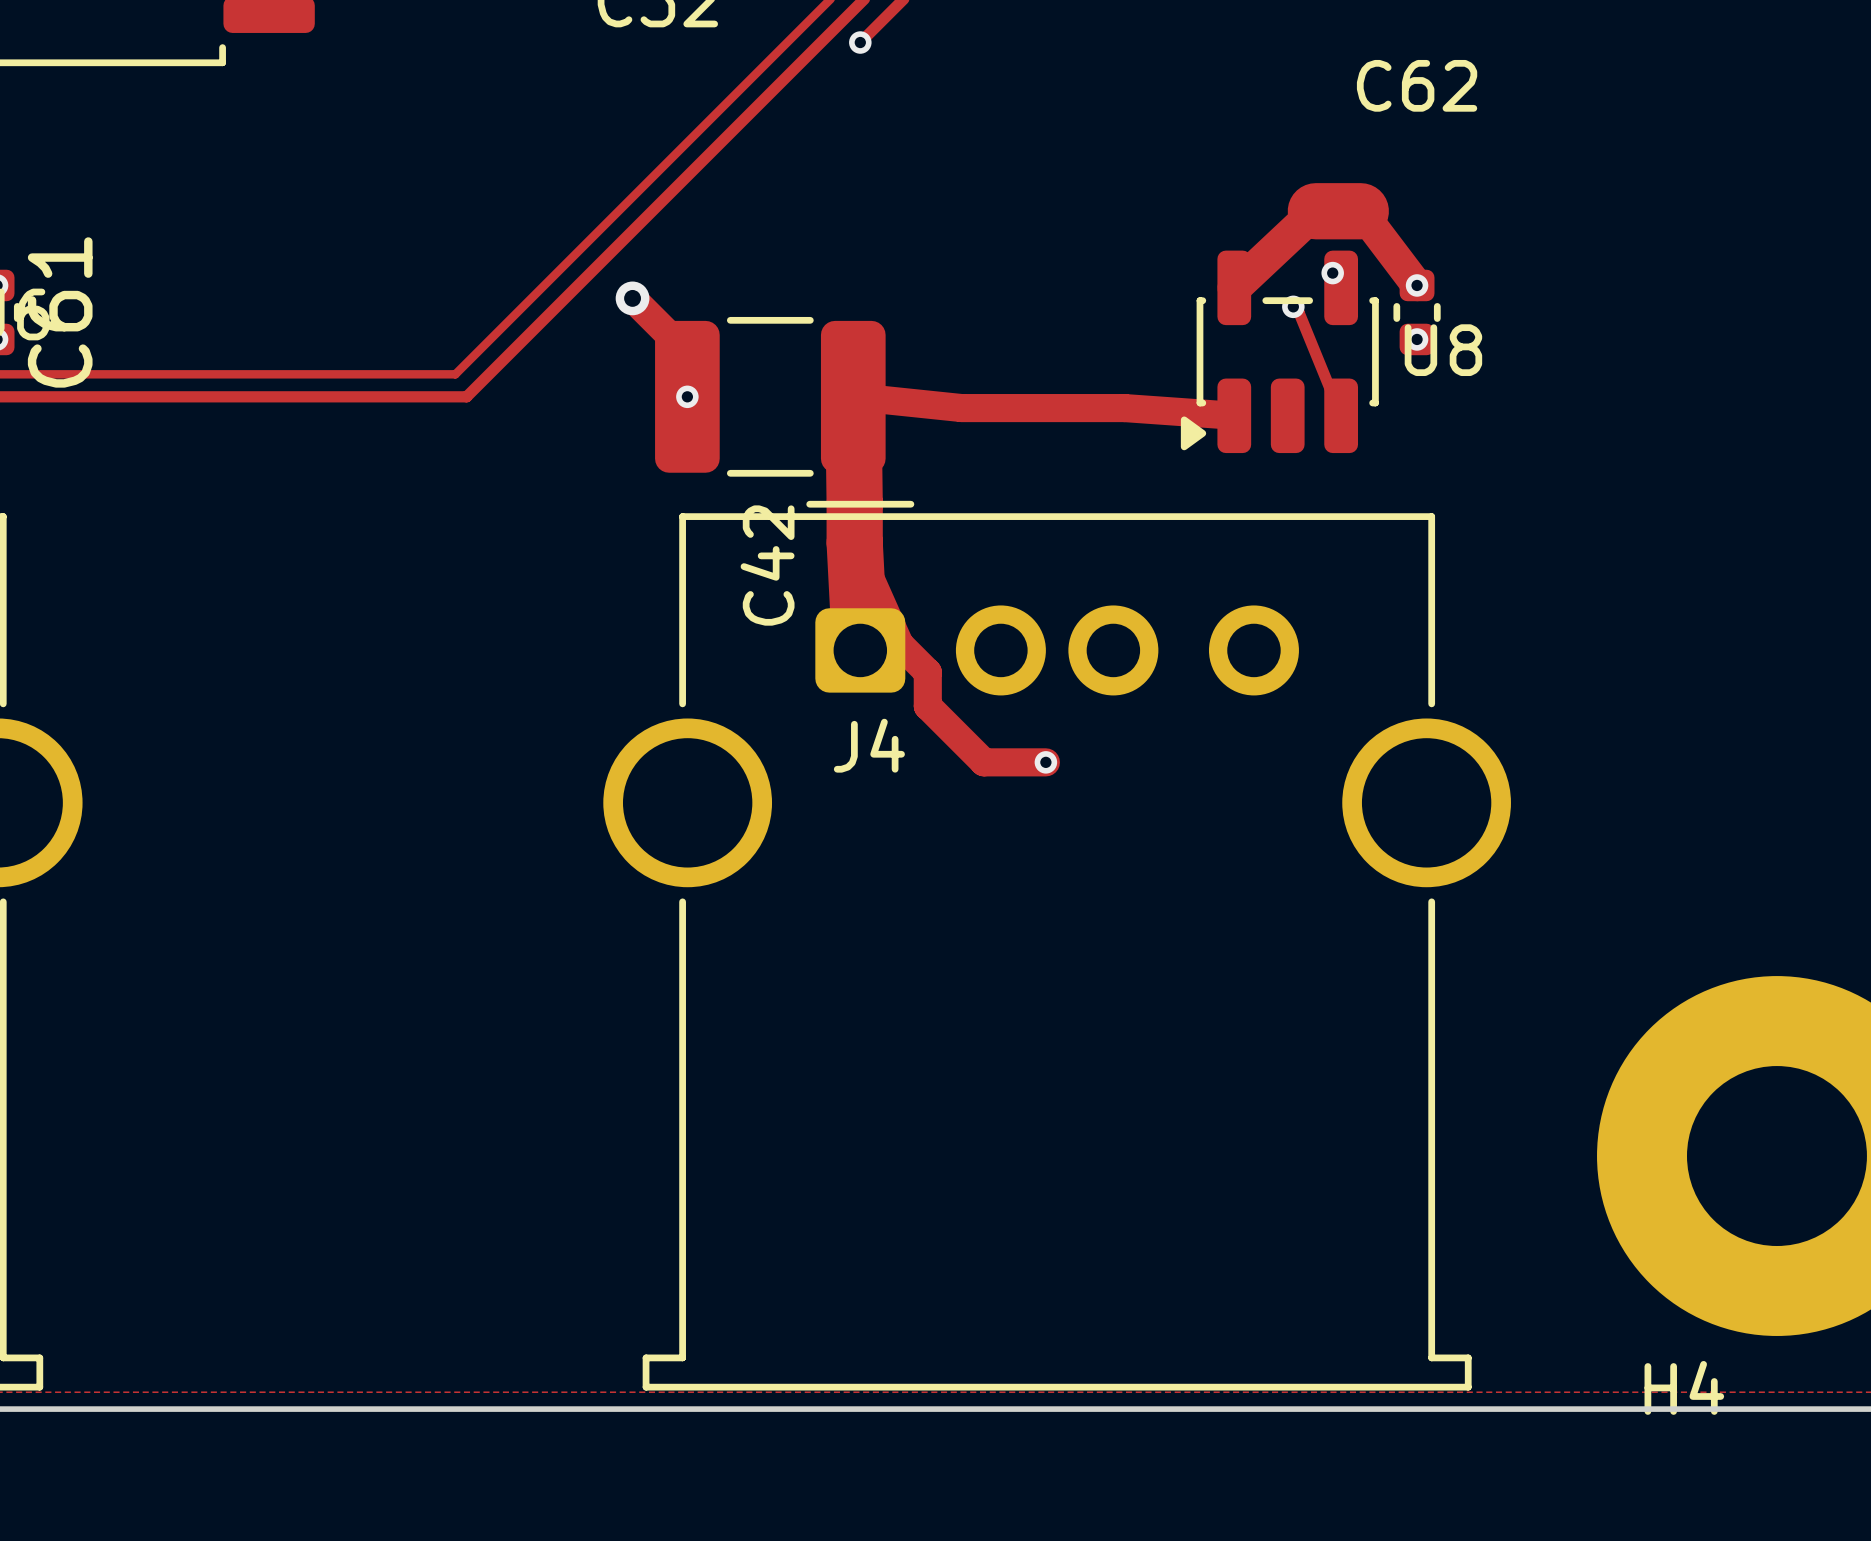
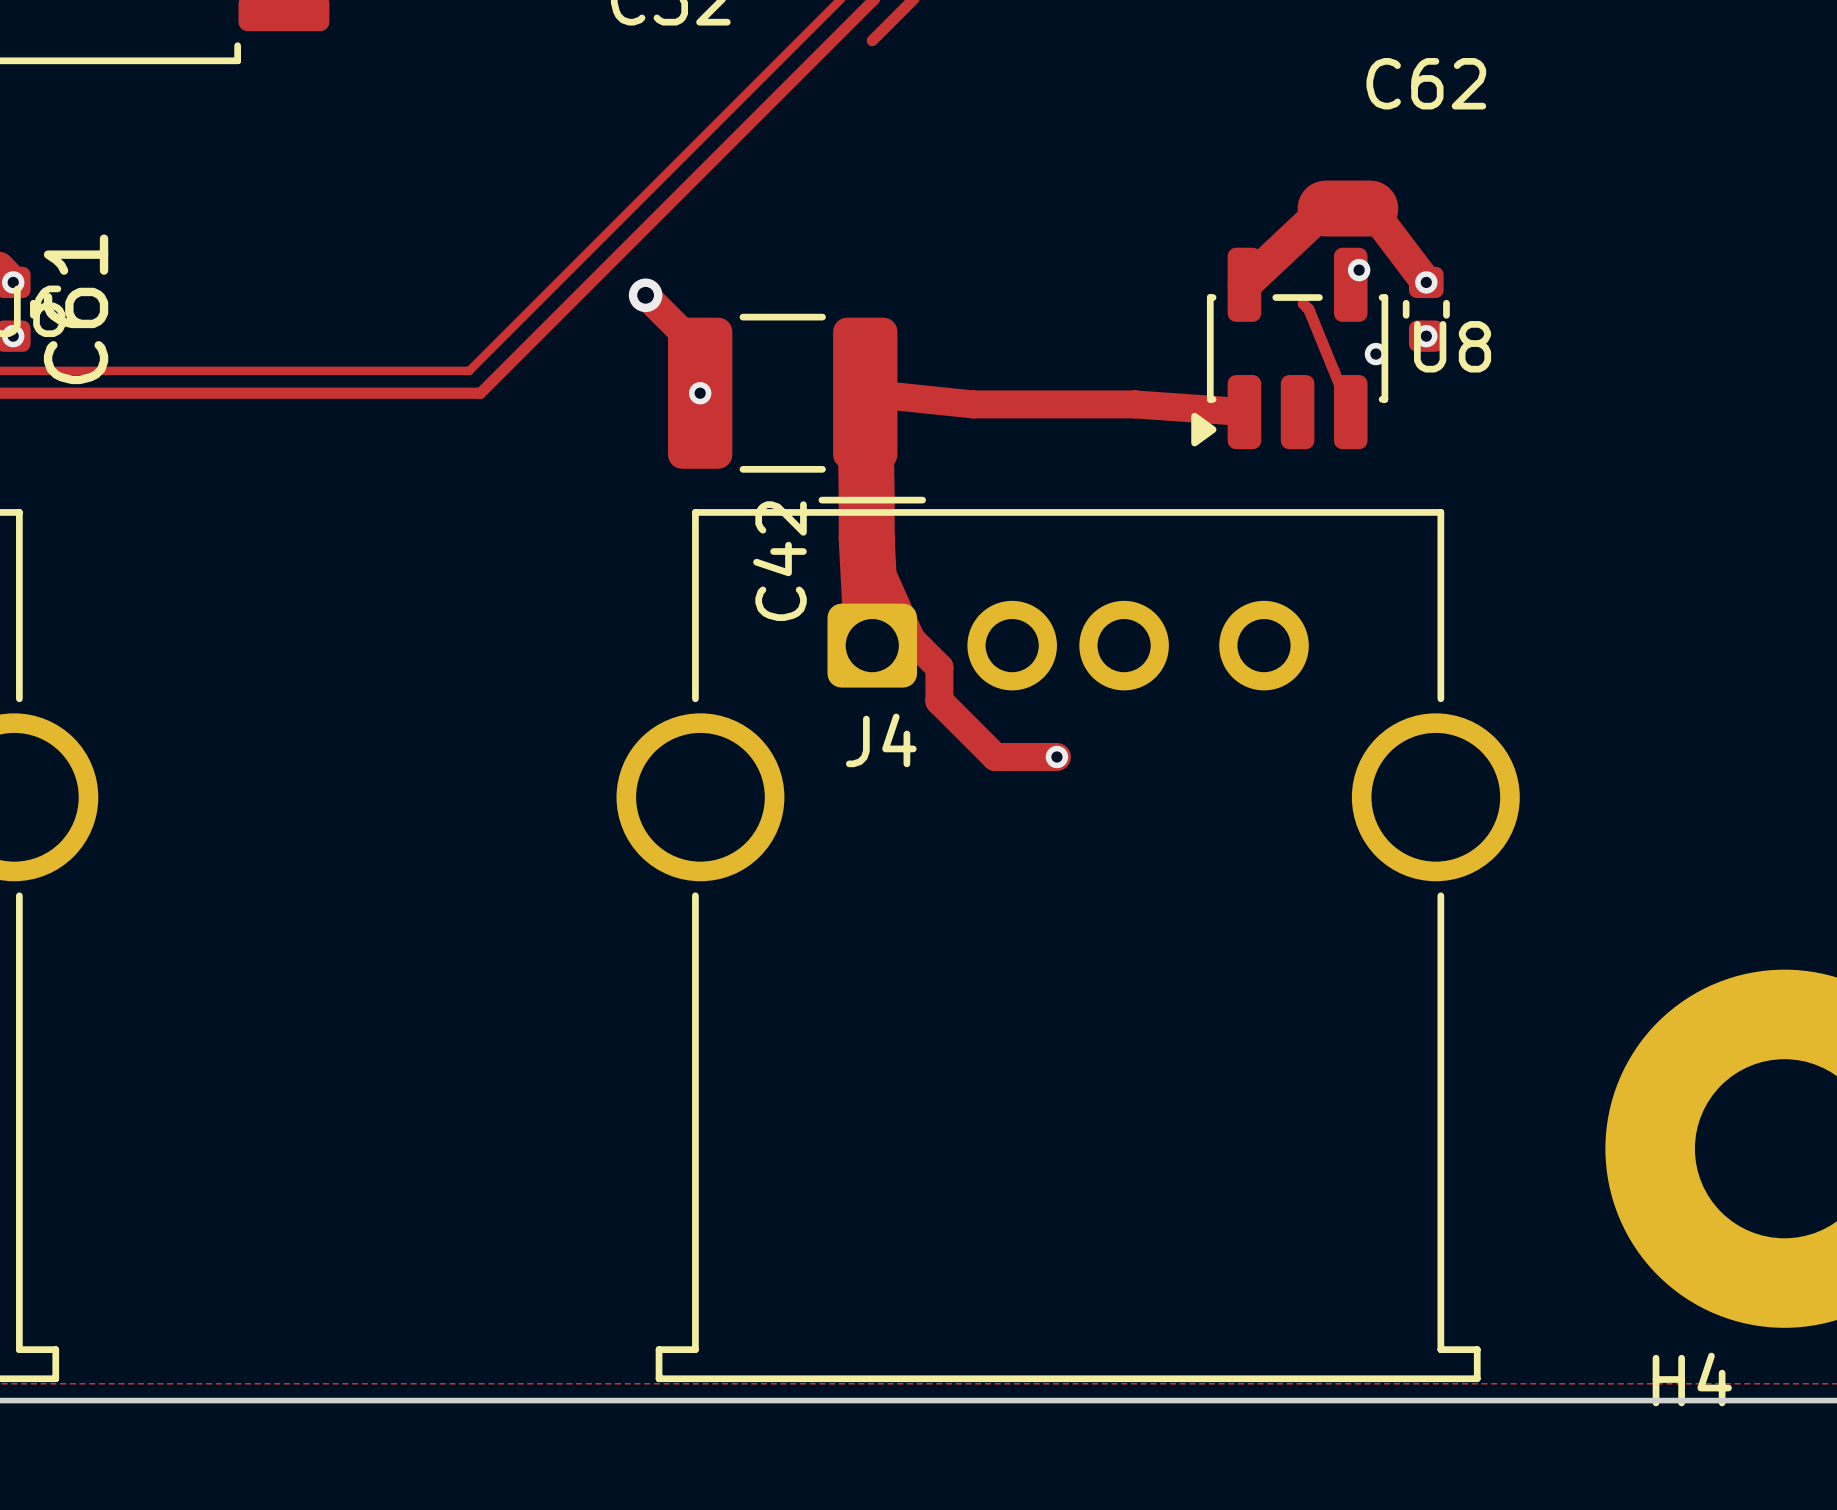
via: (860, 42) -> none
via position: (1332, 273) -> (1359, 270)
via: (1293, 306) -> none
via: none -> (1375, 354)

